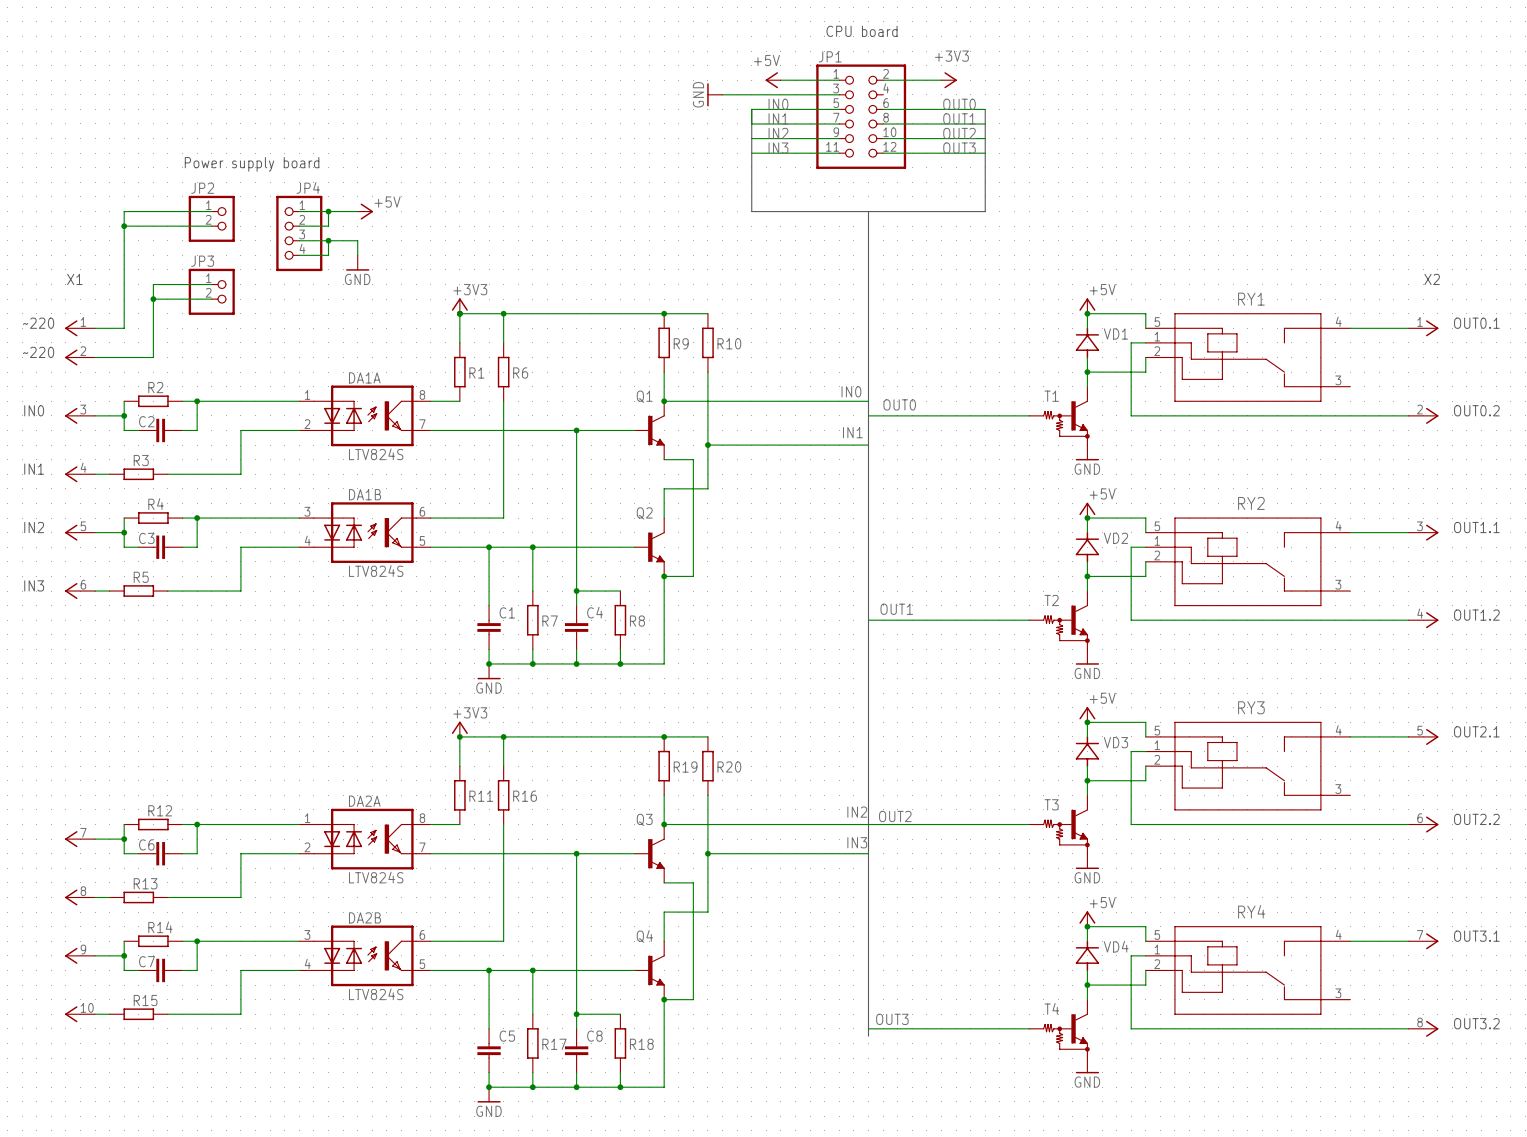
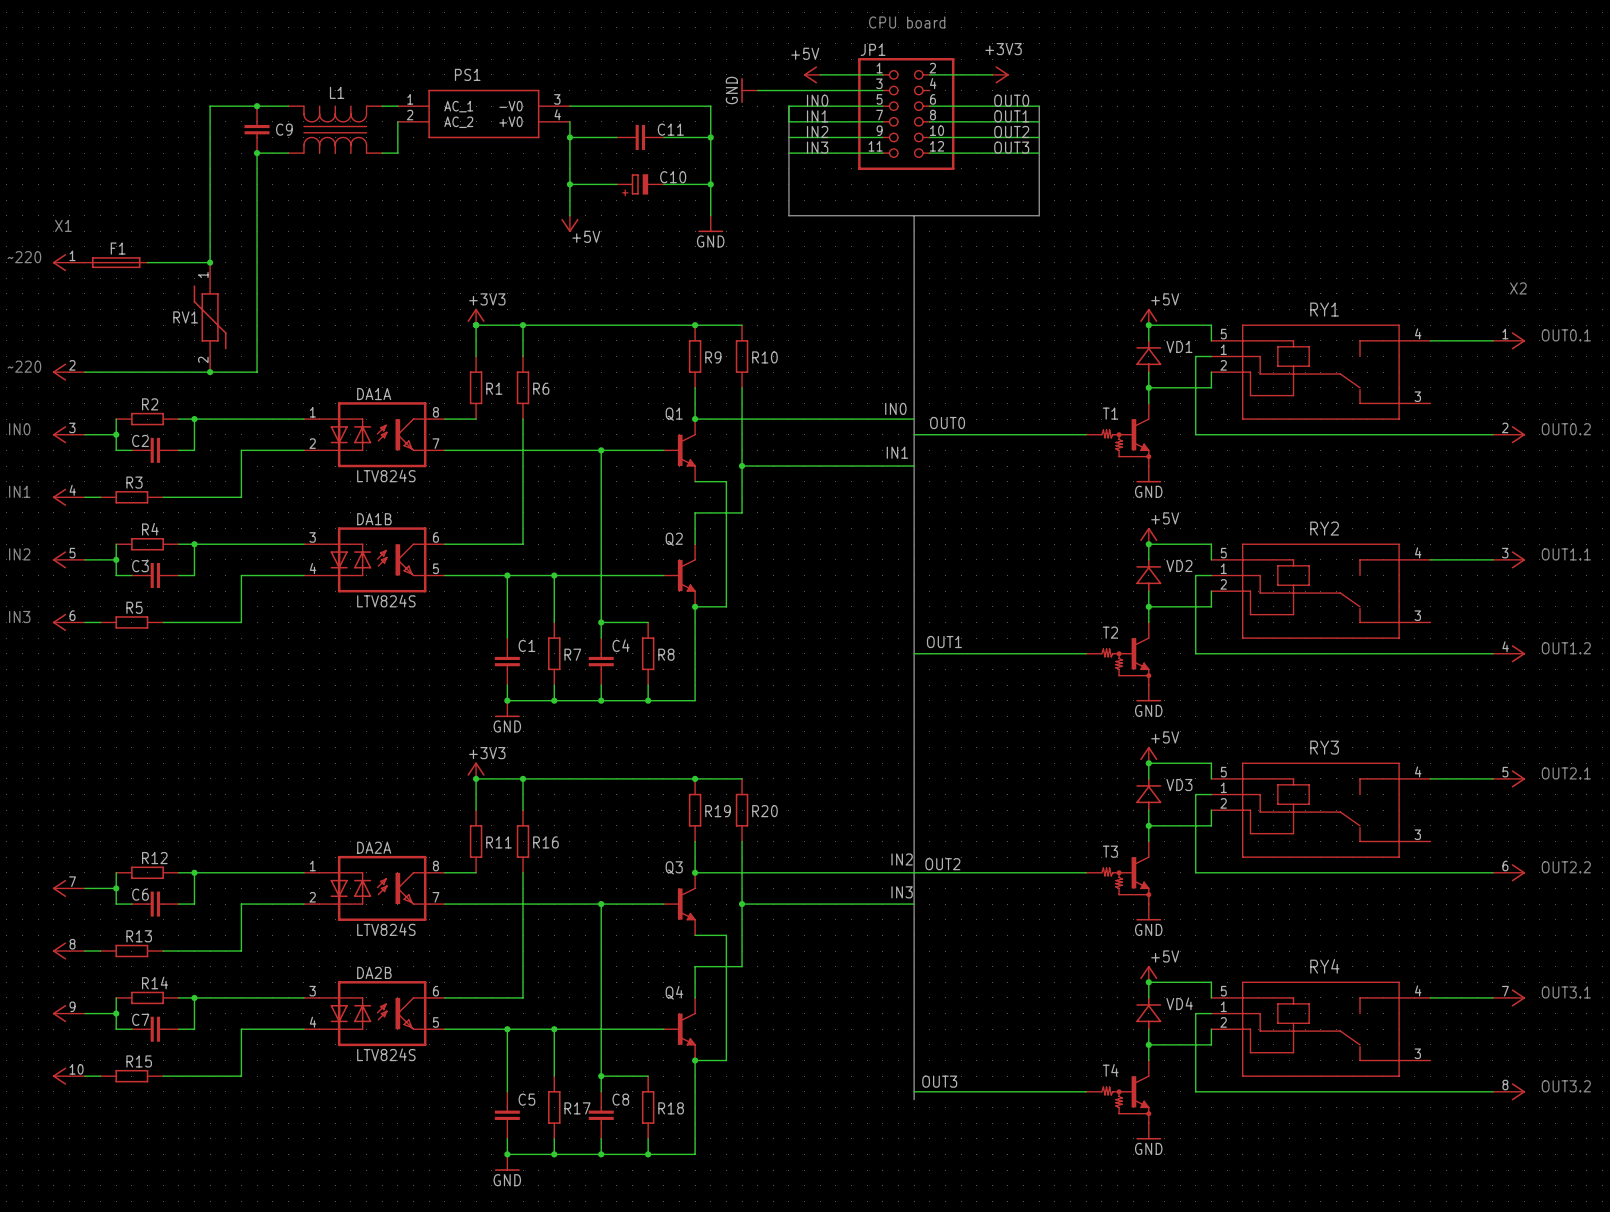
junction: none -> (257, 106)
wire: none -> (288, 106) (210, 106) (210, 262) (147, 262)
wire: none -> (382, 106) (397, 106)
wire: none -> (569, 106) (710, 106) (710, 215)
PS1: none -> (483, 114)
wire: none -> (397, 121) (397, 153) (382, 153)
wire: none -> (569, 121) (569, 215)
C9: none -> (257, 129)
L1: none -> (335, 129)
wire: none -> (569, 137) (616, 137)
junction: none -> (569, 137)
C11: none -> (640, 137)
wire: none -> (663, 137) (710, 137)
junction: none -> (710, 137)
junction: none -> (257, 153)
text: Power supply board (252, 164) -> none
wire: none -> (569, 184) (616, 184)
junction: none -> (569, 184)
C10: none -> (640, 184)
wire: none -> (663, 184) (710, 184)
junction: none -> (710, 184)
wire: (211, 211) (124, 211) (124, 328) (95, 328) -> none
wire: (299, 211) (357, 211) -> none
wire: (328, 211) (328, 226) (299, 226) -> none
junction: (328, 211) -> none
power symbol: +5V (365, 211) -> none
JP2: (211, 218) -> none
power symbol: none -> +5V (569, 223)
power symbol: none -> GND (710, 223)
wire: (124, 226) (211, 226) -> none
junction: (124, 226) -> none
JP4: (299, 233) -> none
wire: (299, 240) (357, 240) (357, 255) -> none
wire: (328, 240) (328, 255) (299, 255) -> none
junction: (328, 240) -> none
F1: none -> (116, 262)
junction: none -> (210, 262)
power symbol: GND (357, 263) -> none
text position: X1 (74, 279) -> X1 (63, 225)
wire: (211, 284) (153, 284) (153, 357) -> (288, 153) (257, 153) (257, 372) (147, 372)
JP3: (211, 291) -> none
wire: (153, 299) (211, 299) -> none
junction: (153, 299) -> none
RV1: none -> (210, 317)
text position: ~220 (38, 323) -> ~220 (24, 257)
part position: (80, 328) -> (68, 262)
junction: none -> (210, 372)

